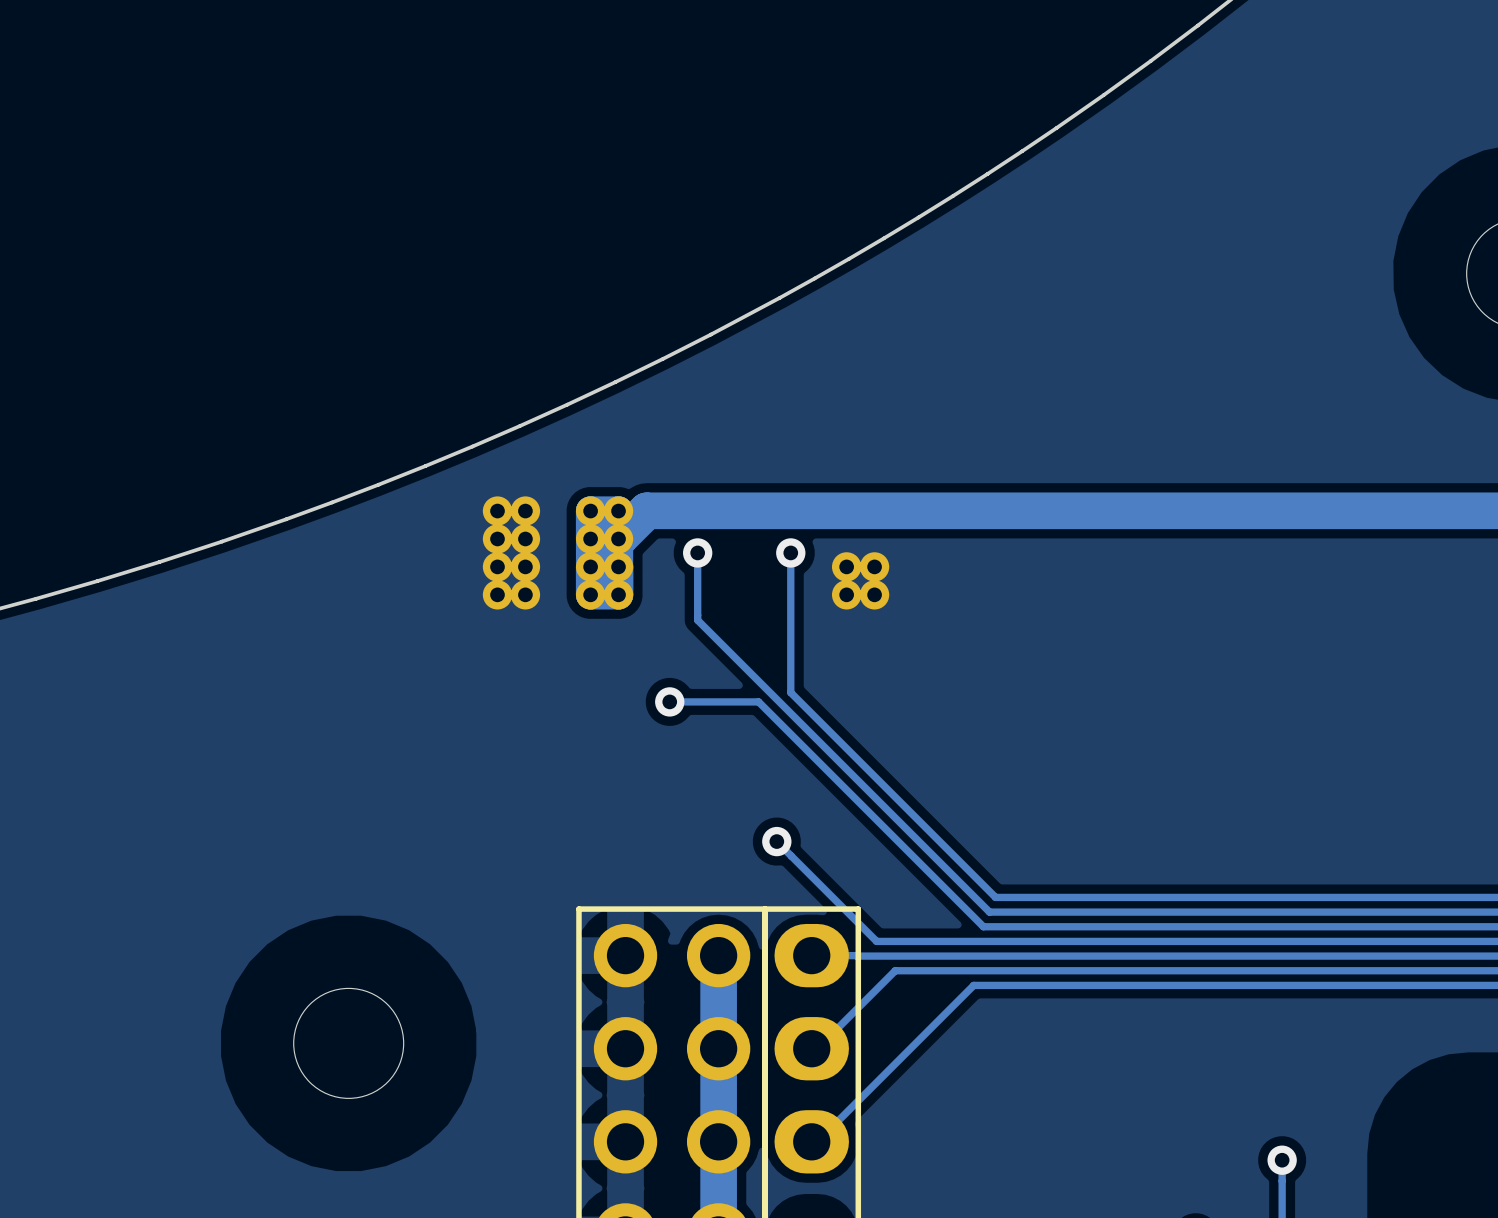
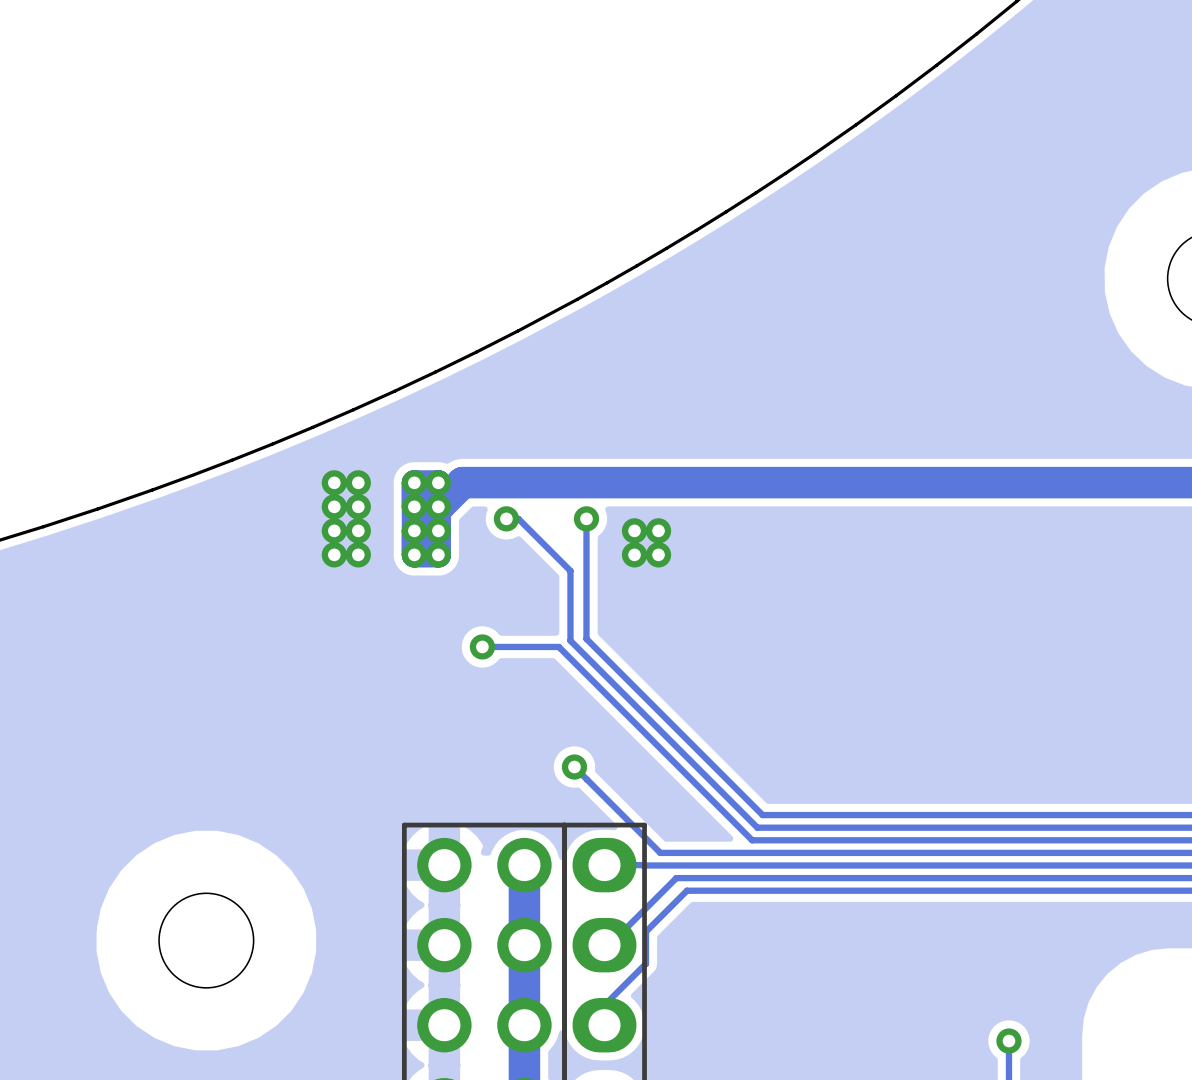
track: (697, 552) (697, 620) (772, 694) -> (506, 518) (518, 518) (570, 570) (570, 640)
track: (973, 985) (817, 1141) (811, 1141) -> (743, 890) (686, 890) (645, 931) (645, 963) (604, 1005) (604, 1025)

